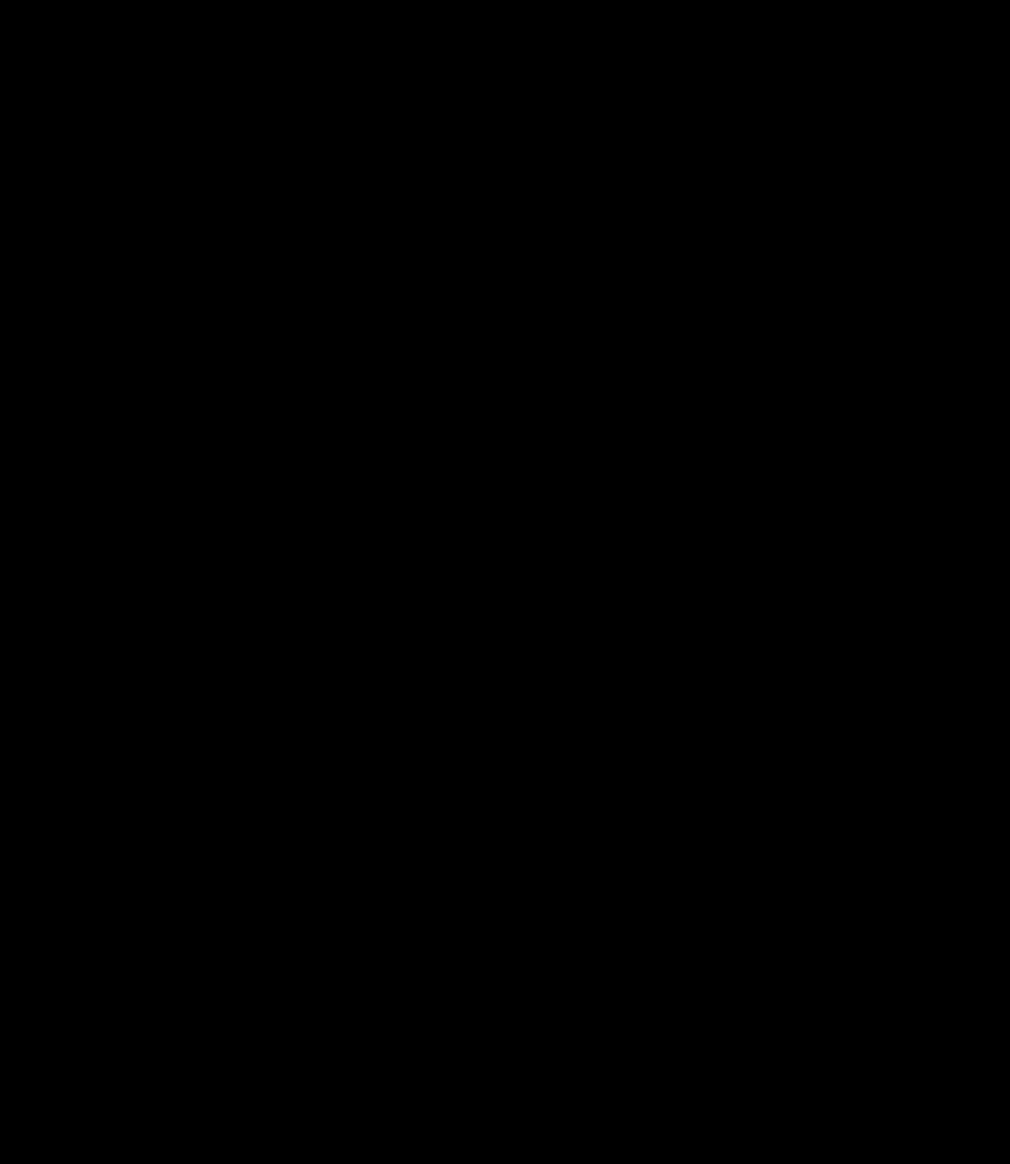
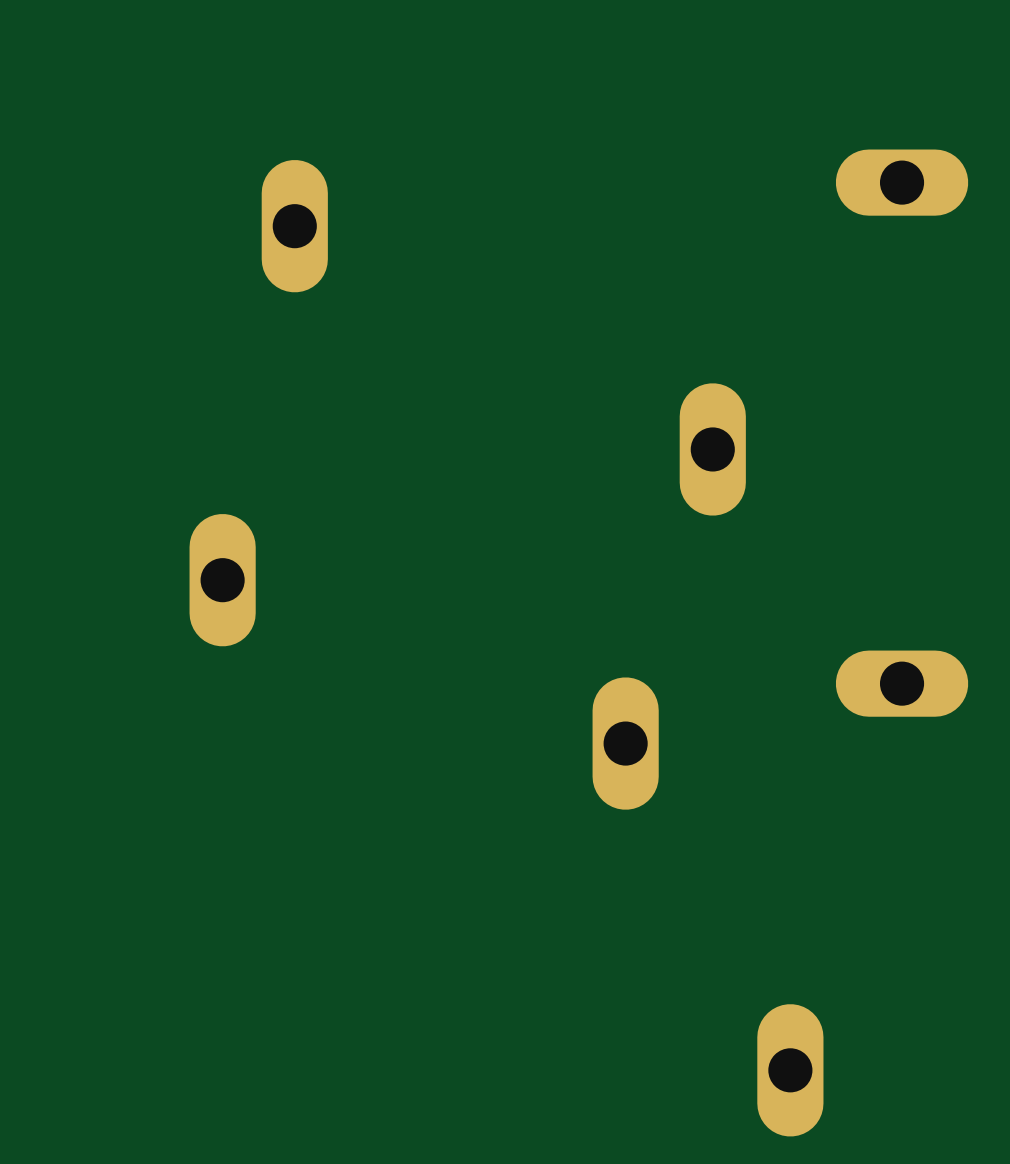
part: none -> (902, 182)
part: none -> (294, 226)
part: none -> (712, 449)
part: none -> (222, 580)
part: none -> (902, 683)
part: none -> (625, 743)
part: none -> (790, 1070)

